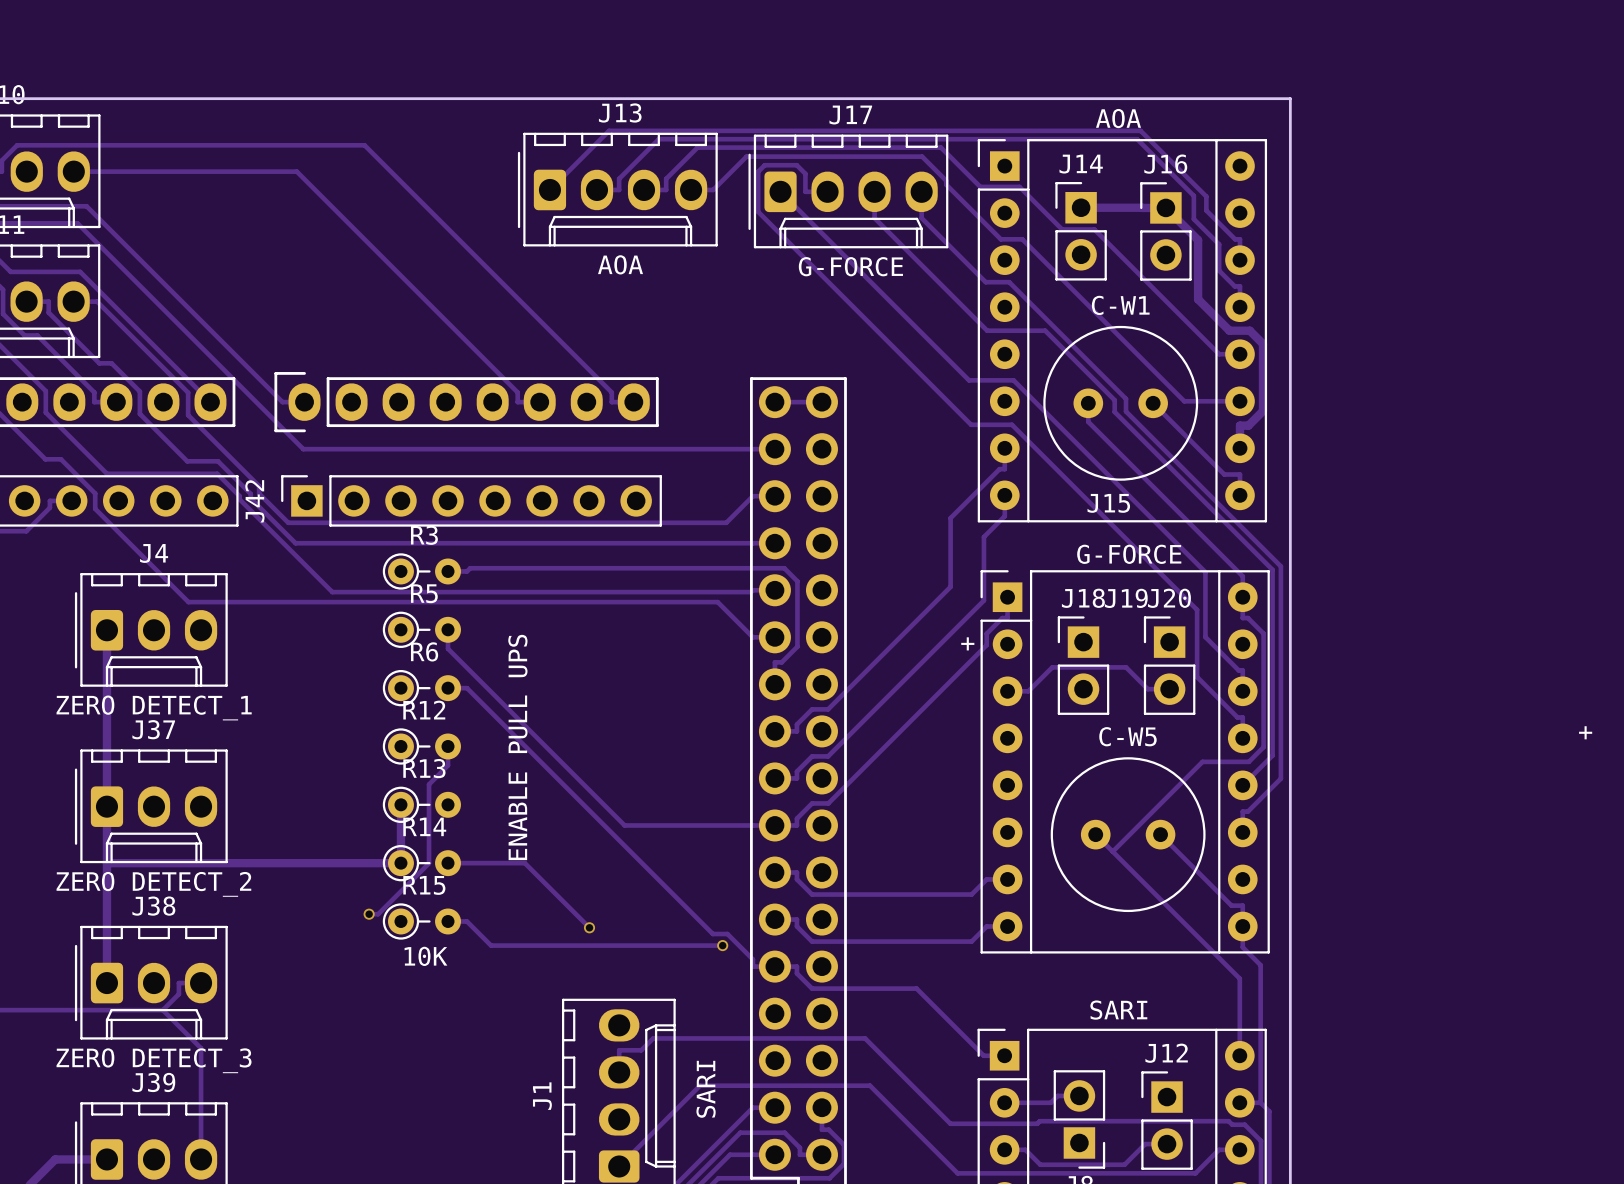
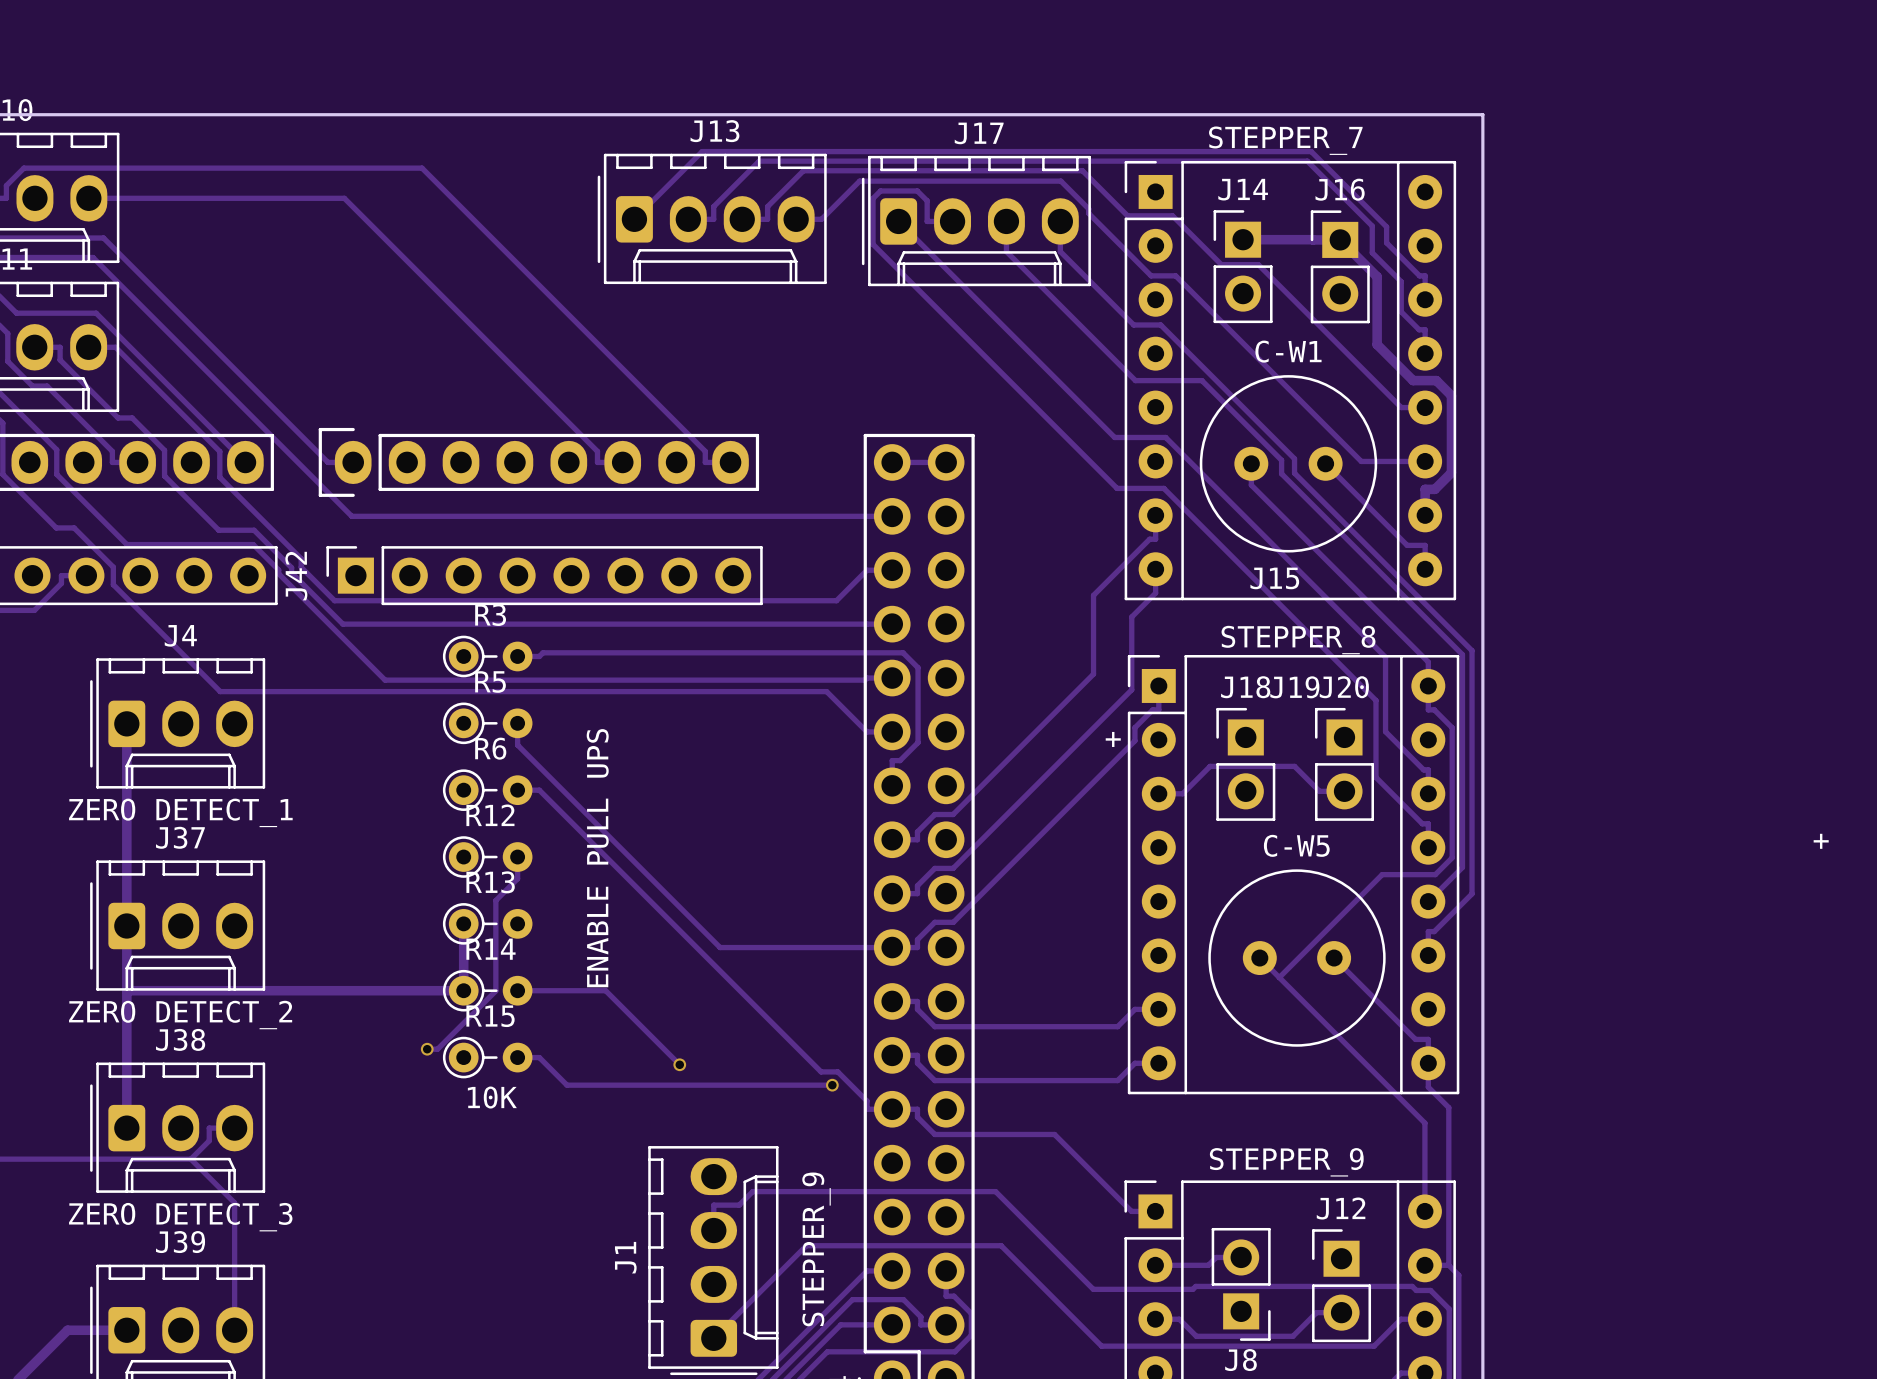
J15 value: AOA (1118, 118) -> STEPPER_7 (1285, 140)
J13 value: AOA (620, 264) -> none
J17 value: G-FORCE (850, 266) -> none
J19 value: G-FORCE (1129, 554) -> STEPPER_8 (1298, 640)
part value: SARI (1118, 1010) -> STEPPER_9 (1286, 1162)
J1 value: SARI (706, 1089) -> STEPPER_9 (816, 1249)

